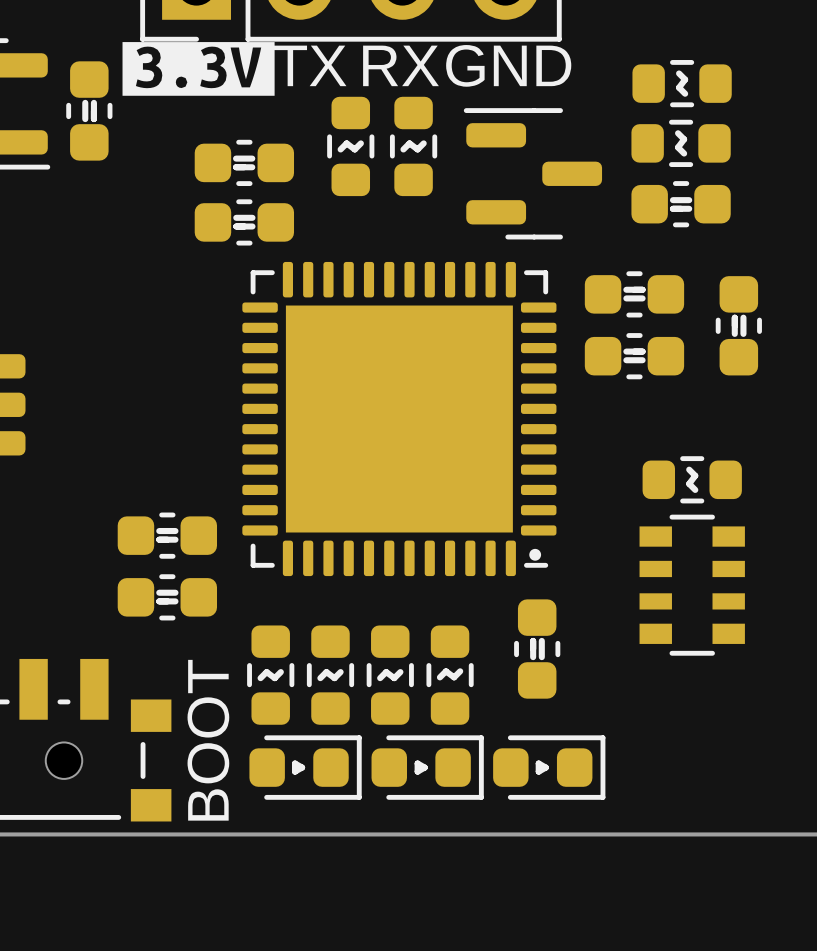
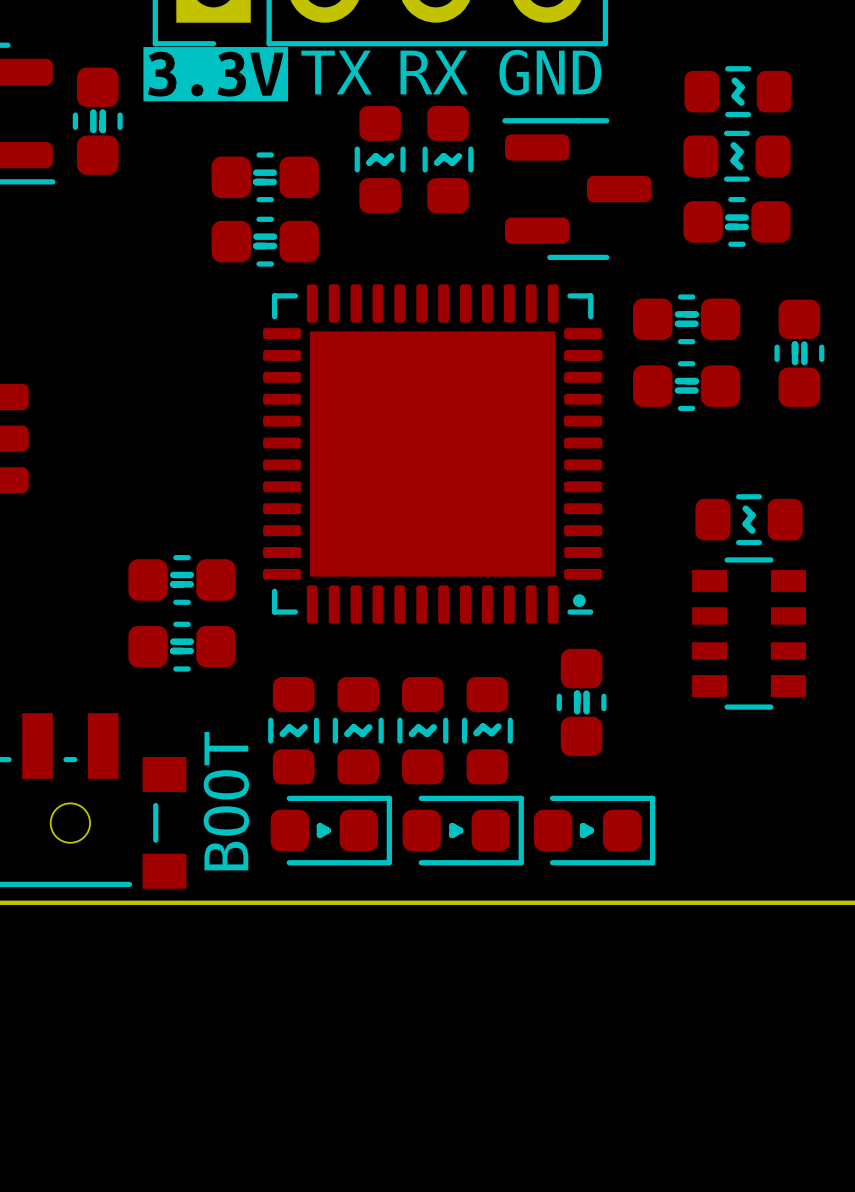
drawing shape: [122, 42, 275, 96] -> [143, 47, 289, 102]

